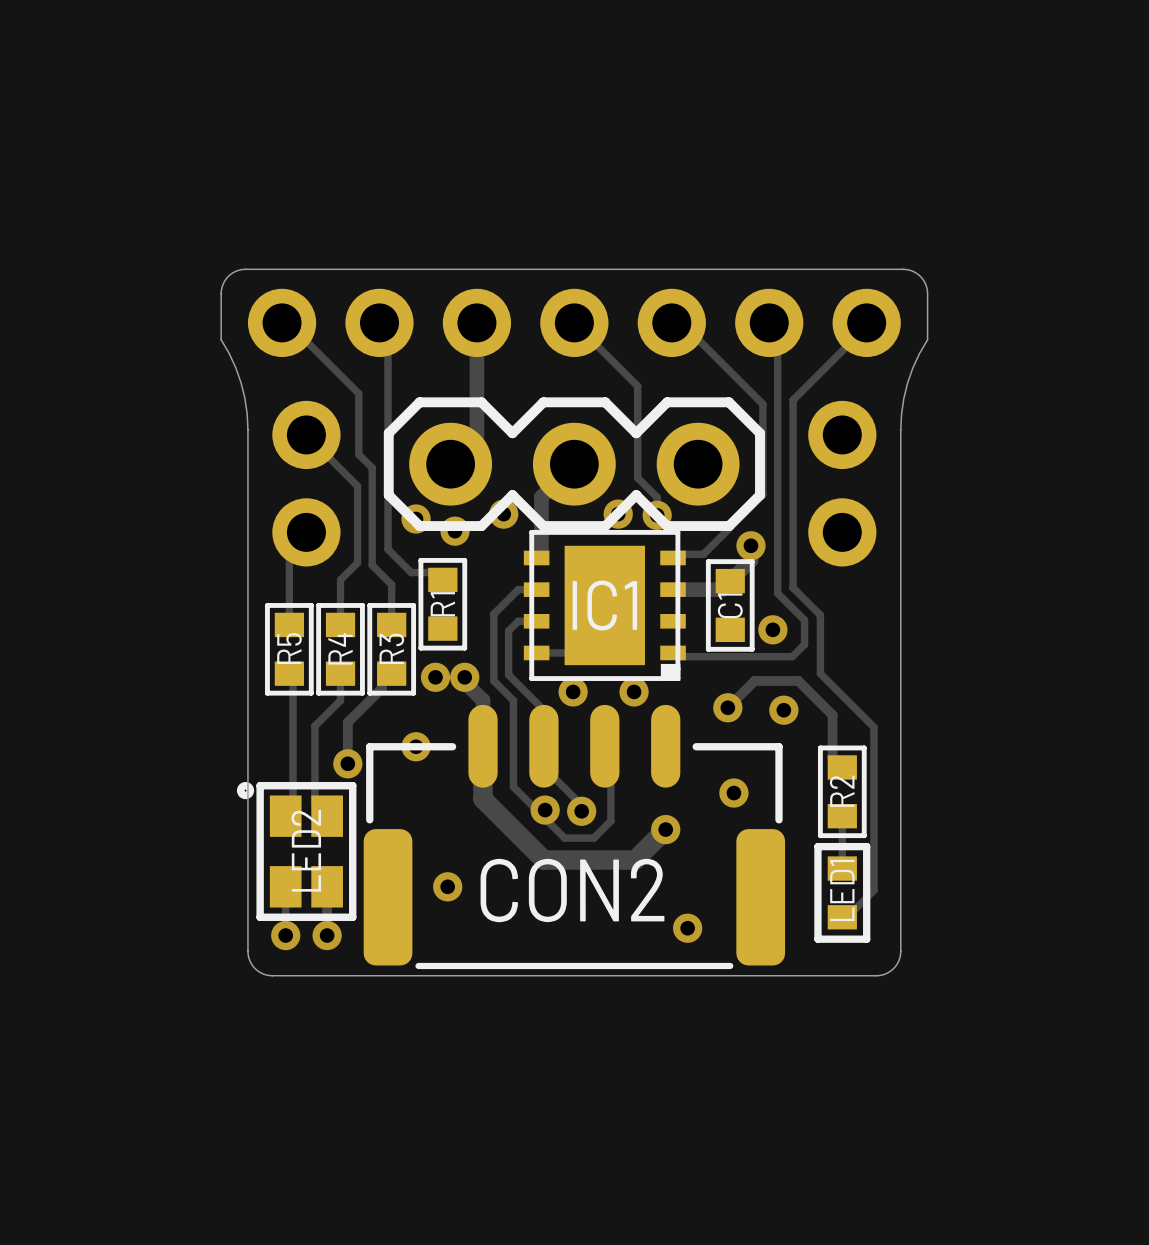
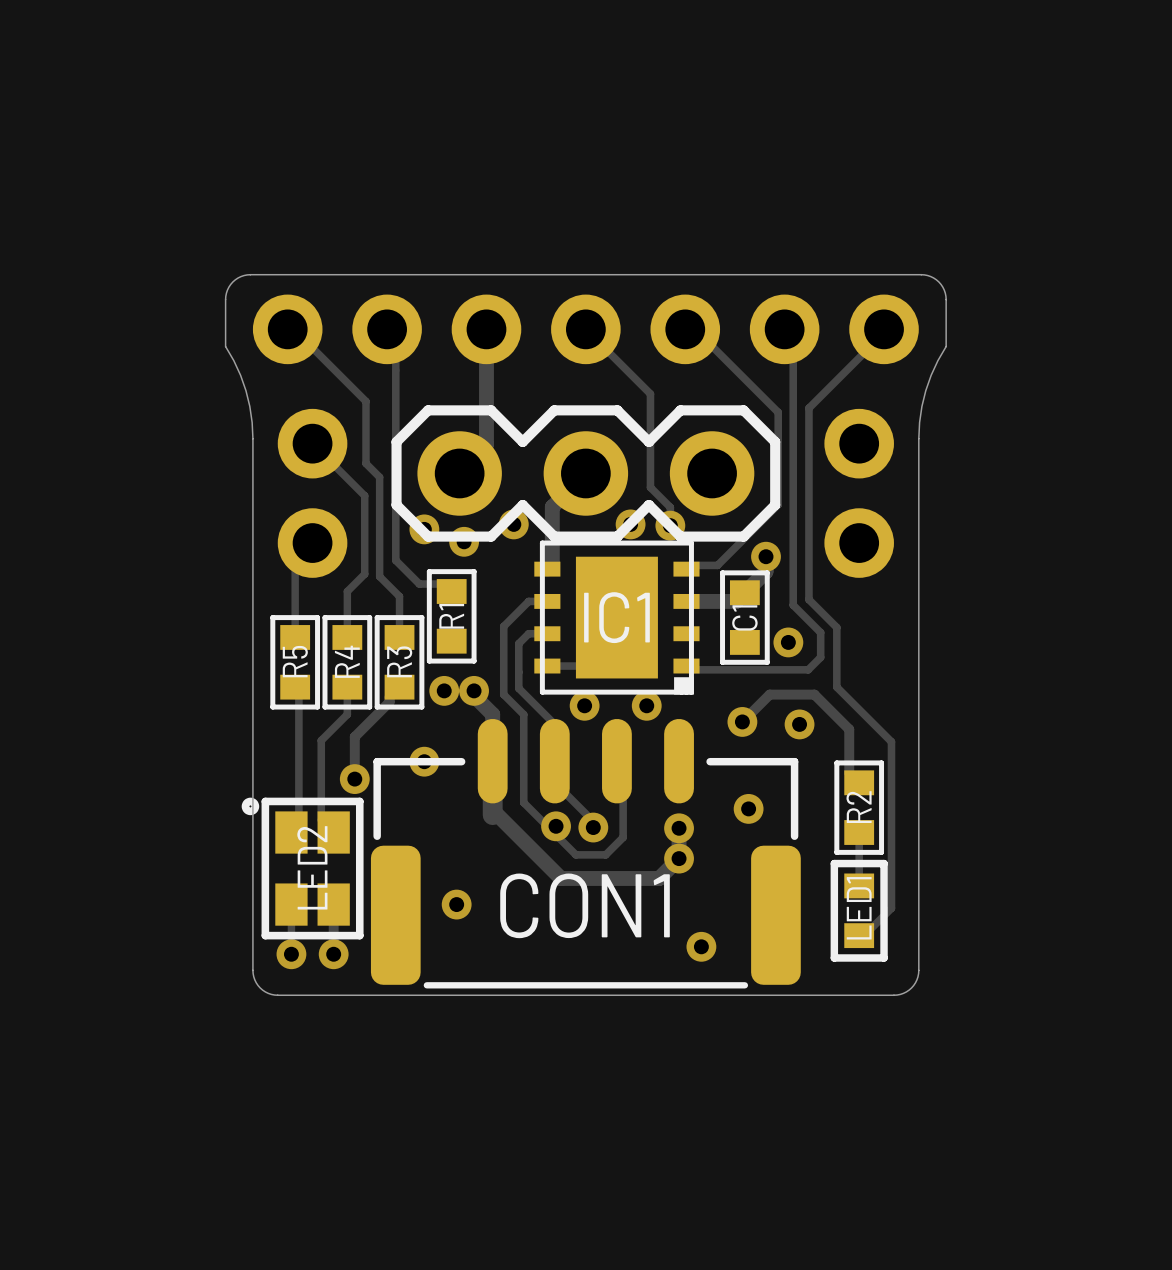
track: none -> (492, 810) (561, 878) (659, 878) (679, 858) (679, 828)
track: (483, 799) (543, 860) (635, 860) (665, 829) -> none
via: none -> (679, 828)
via: (665, 829) -> none
via: none -> (679, 858)
CON2 name: CON2 (572, 890) -> CON1 (585, 905)

